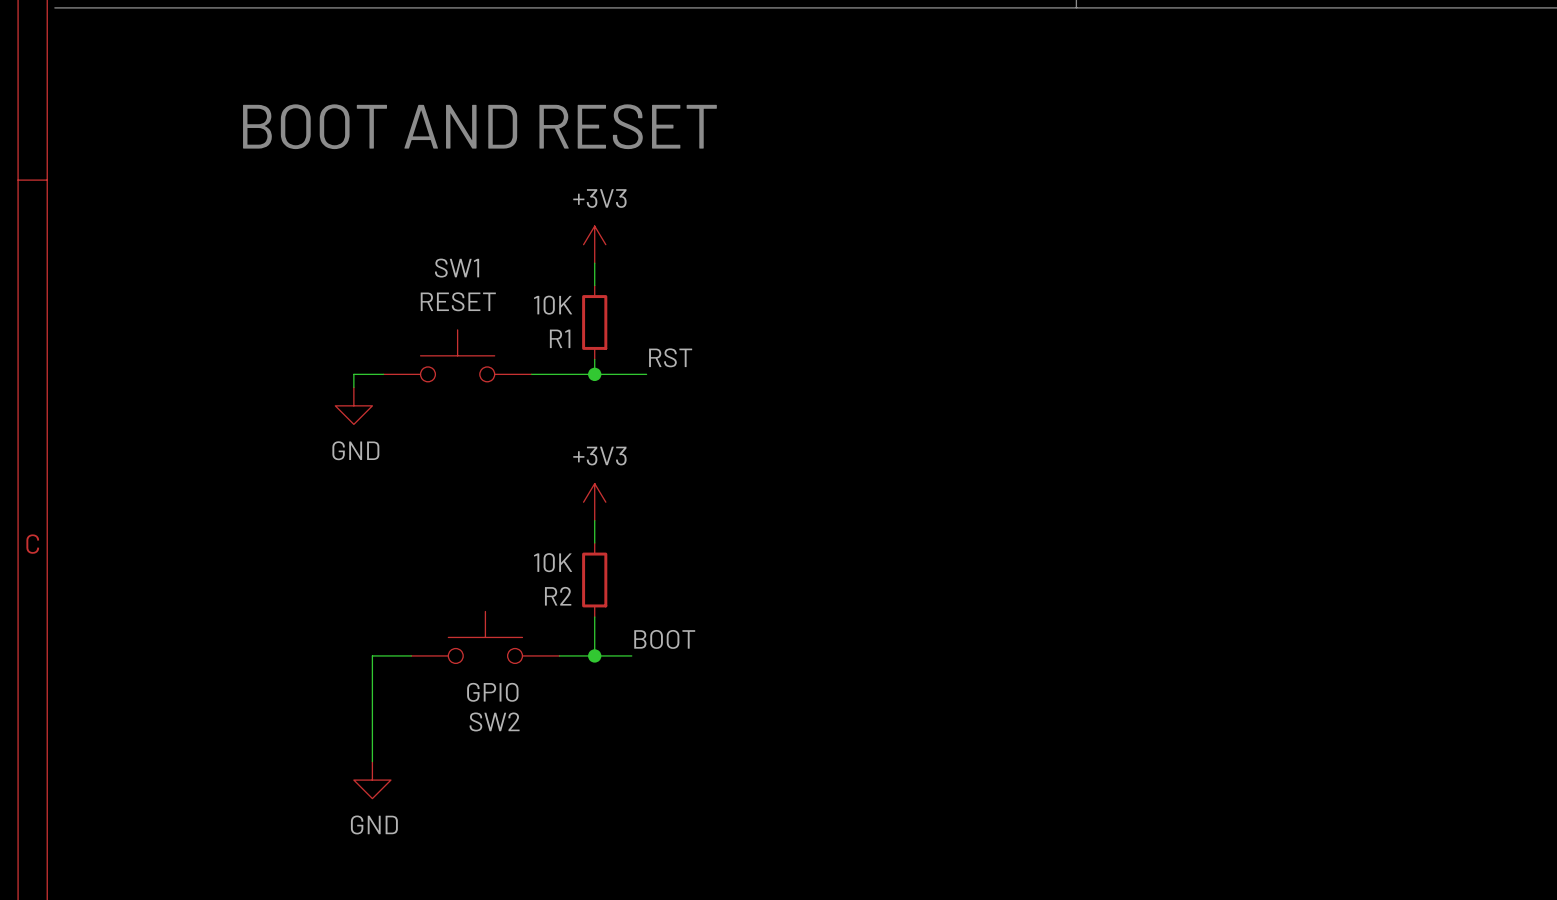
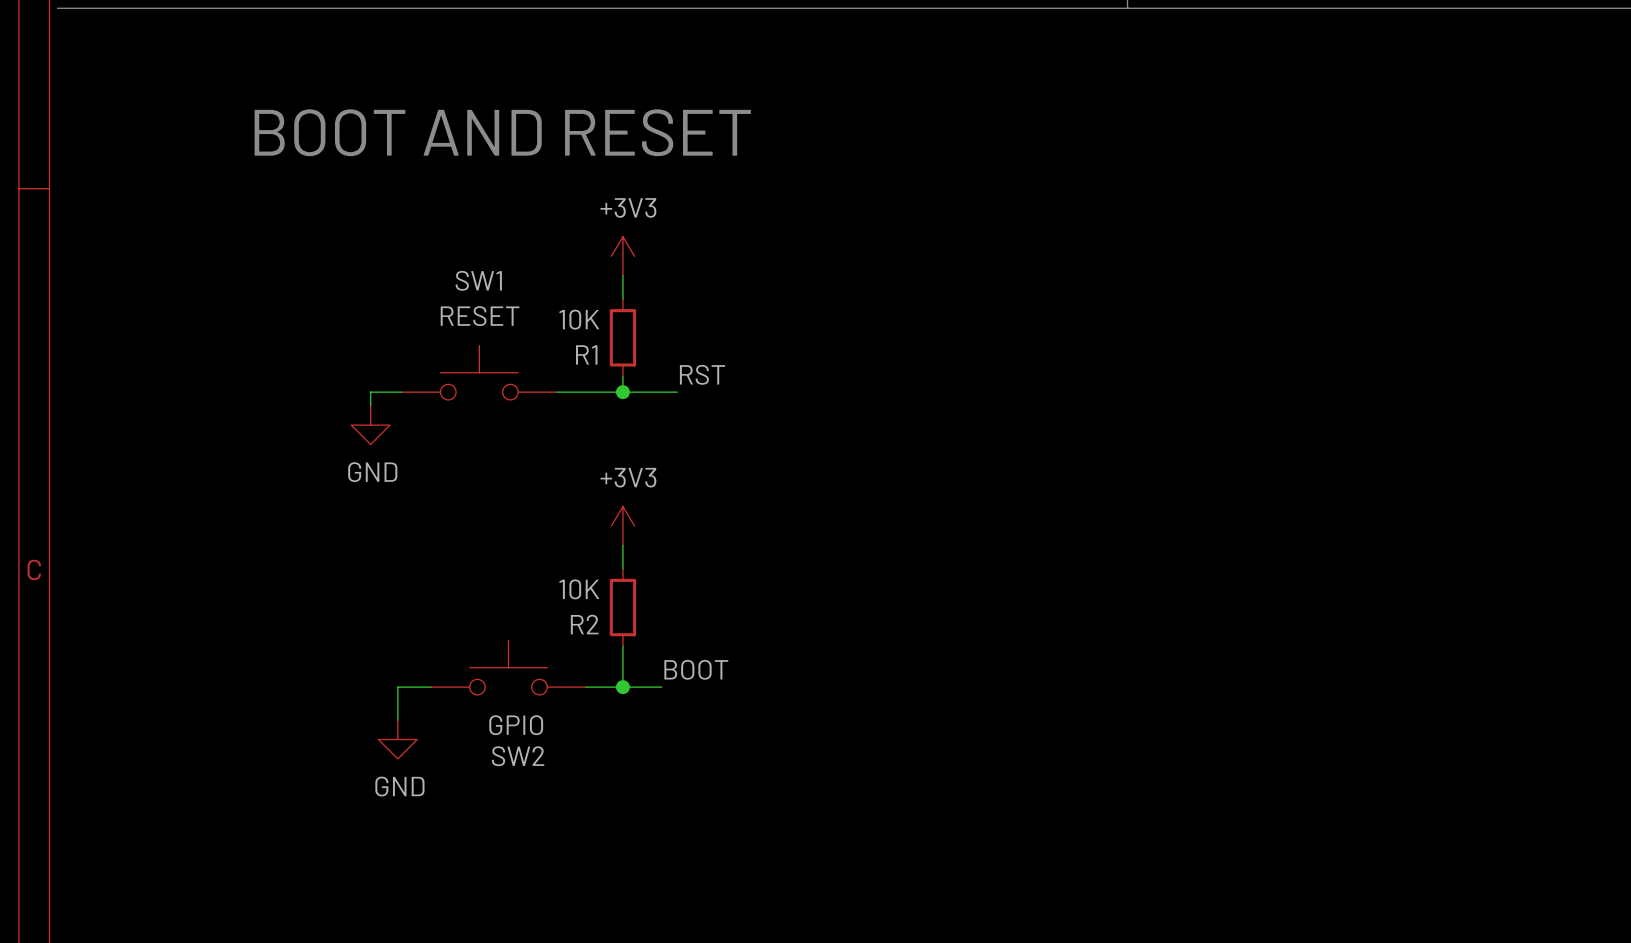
wire: (379, 655) (372, 655) (372, 761) -> (397, 687) (397, 720)
power symbol position: GND (372, 780) -> GND (397, 739)

